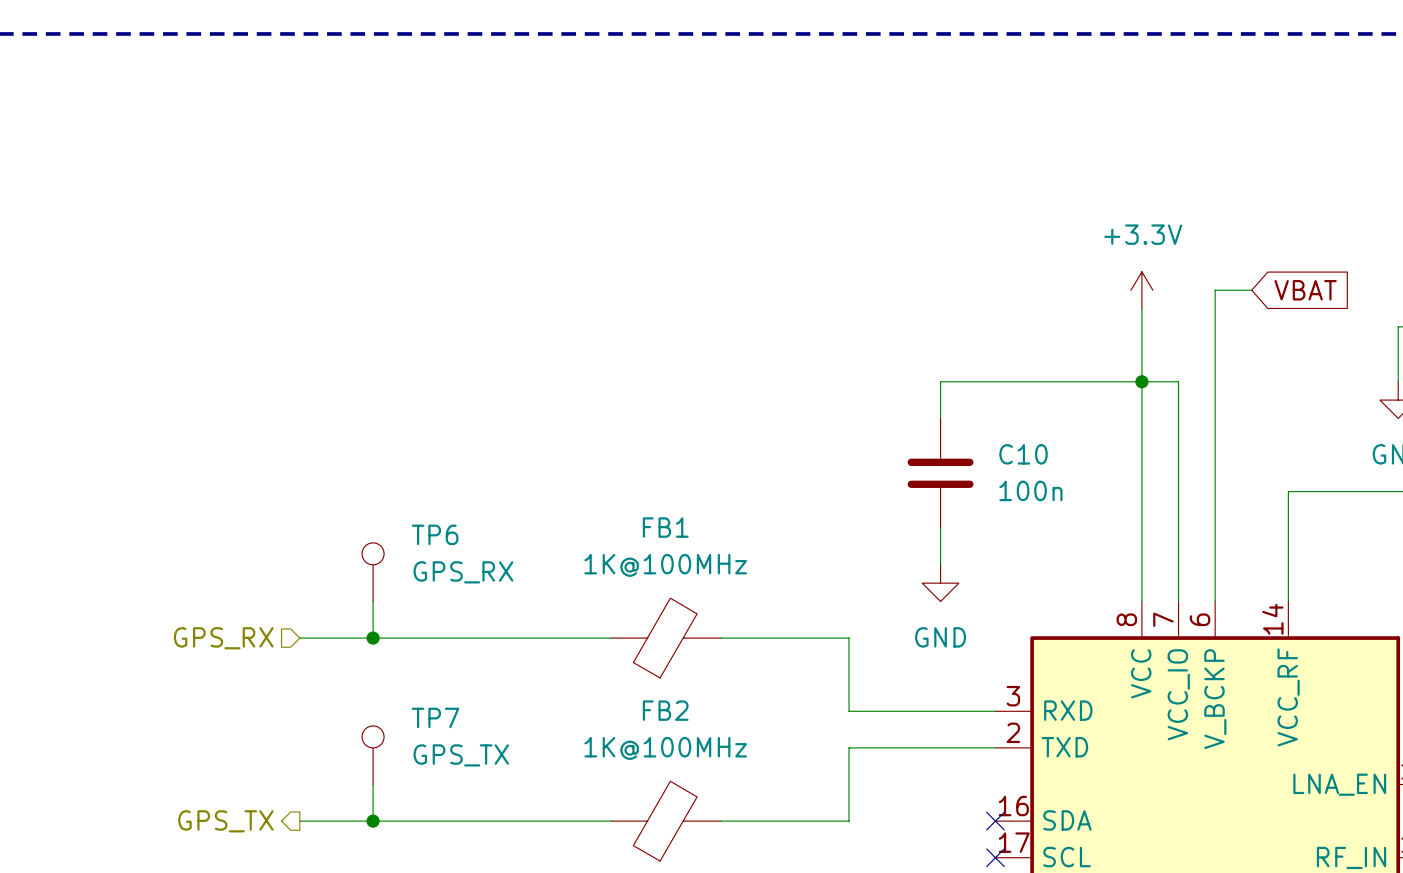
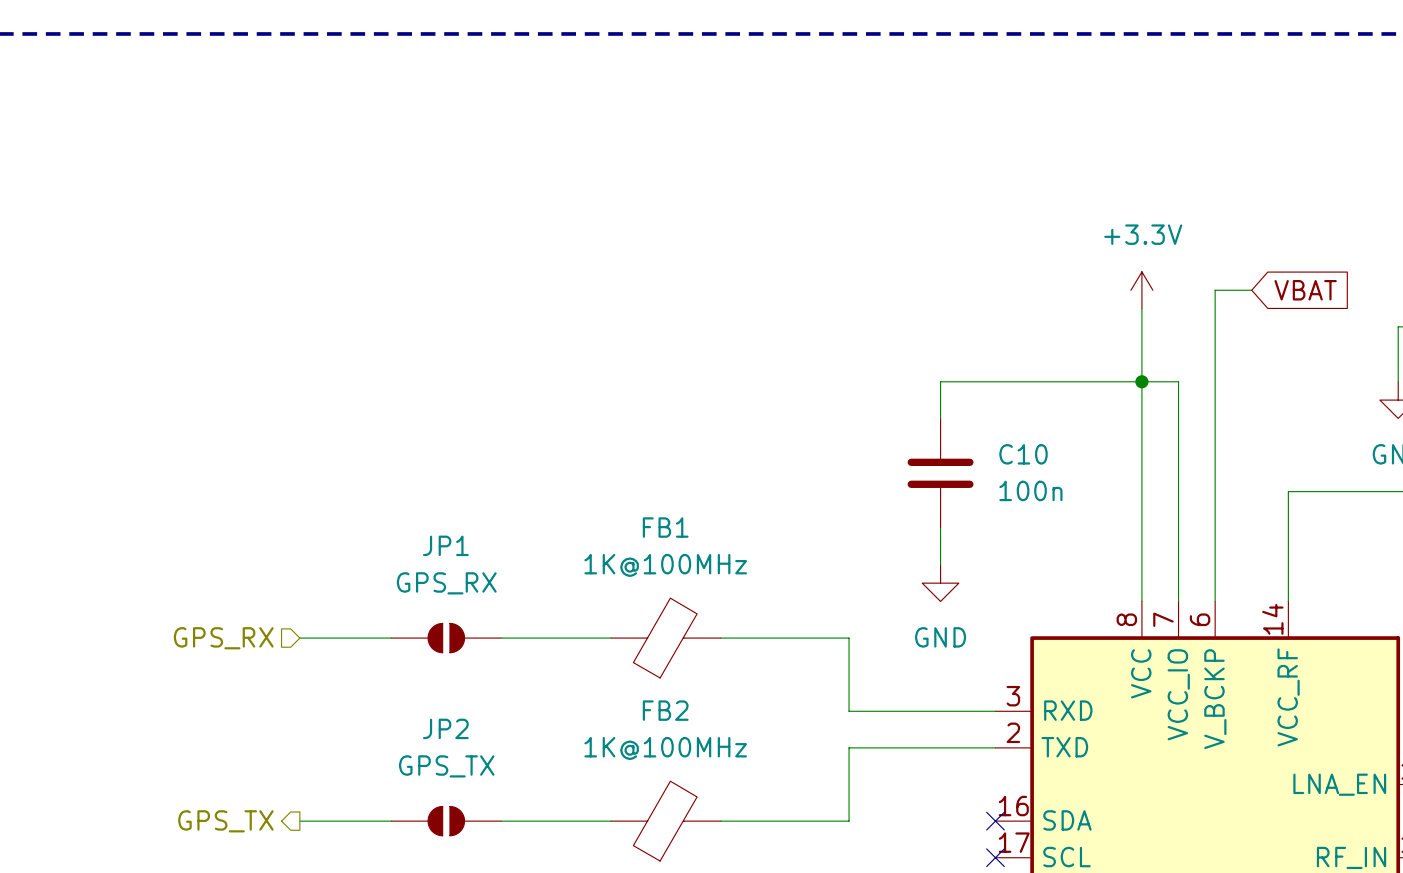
TP6: GPS_RX (373, 572) -> none
wire: (373, 601) (373, 638) -> none
junction: (373, 638) -> none
JP1: none -> GPS_RX (446, 638)
TP7: GPS_TX (373, 755) -> none
wire: (373, 784) (373, 821) -> none
junction: (373, 821) -> none
JP2: none -> GPS_TX (446, 821)

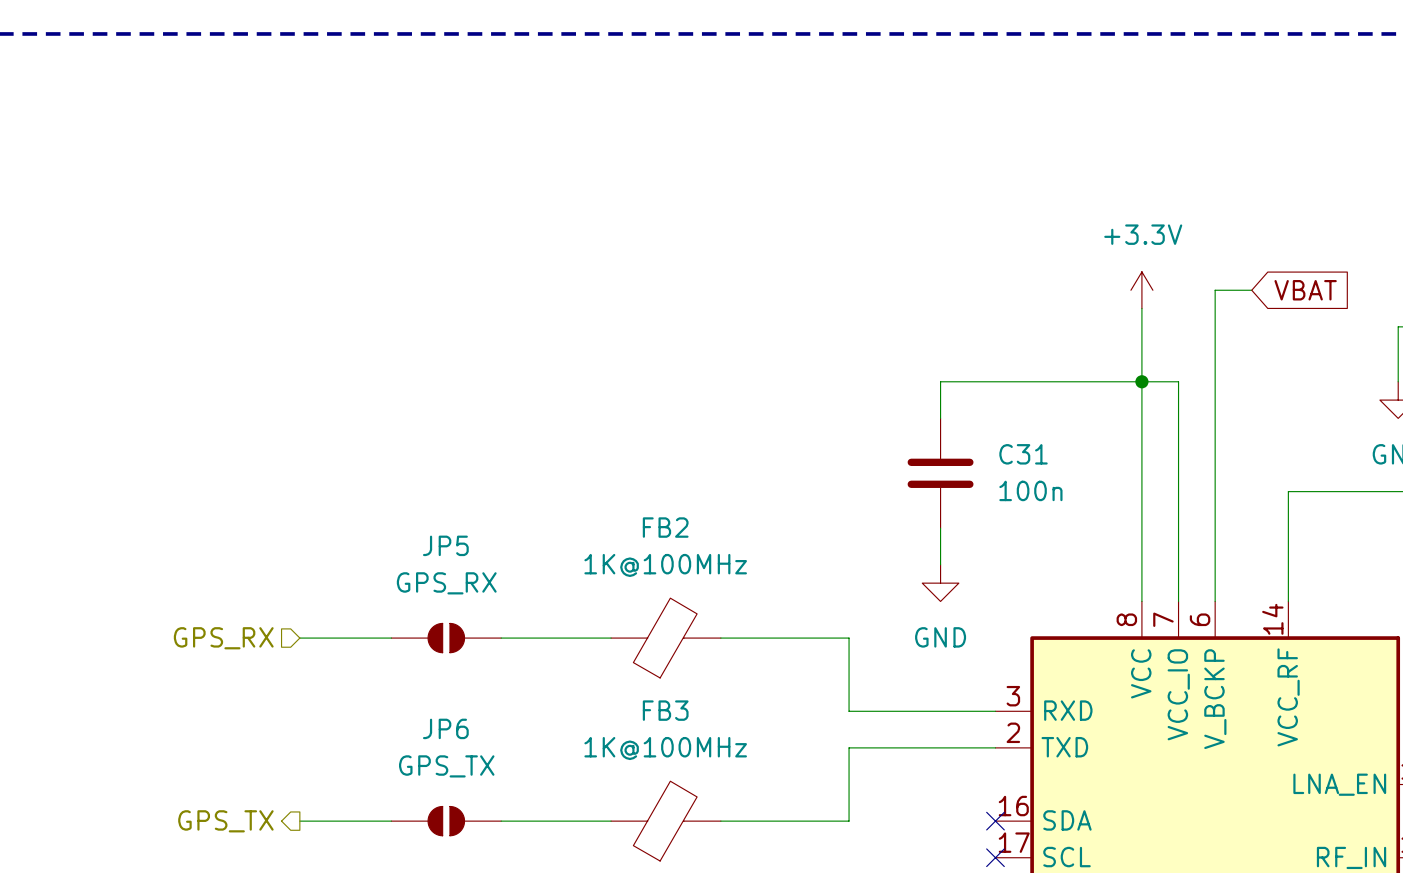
C10 name: C10 (1023, 454) -> C31 (1023, 454)
FB1 name: FB1 (665, 527) -> FB2 (665, 527)
JP1 name: JP1 (445, 545) -> JP5 (445, 545)
FB2 name: FB2 (665, 710) -> FB3 (665, 710)
JP2 name: JP2 (445, 728) -> JP6 (445, 728)

